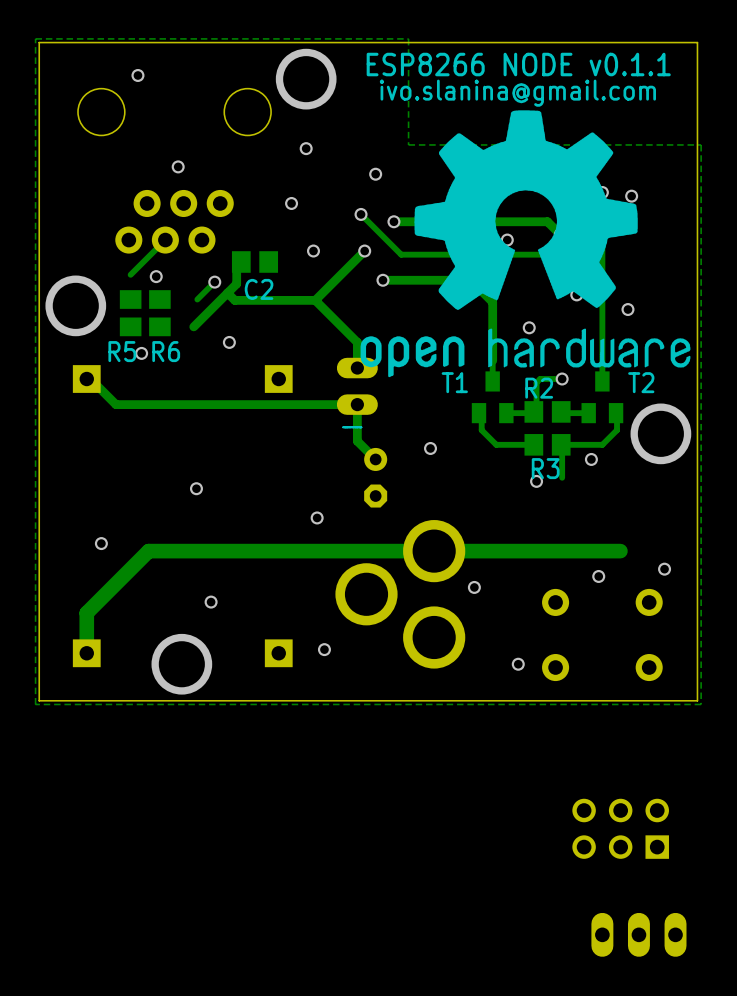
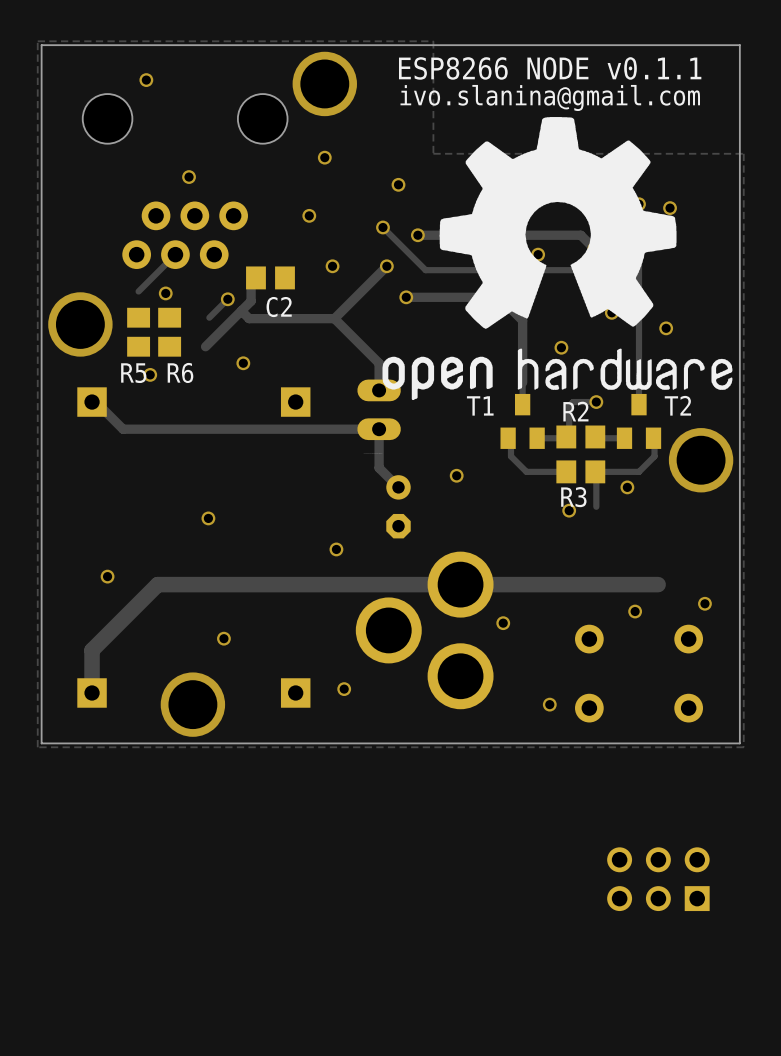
part: (638, 934) -> none

